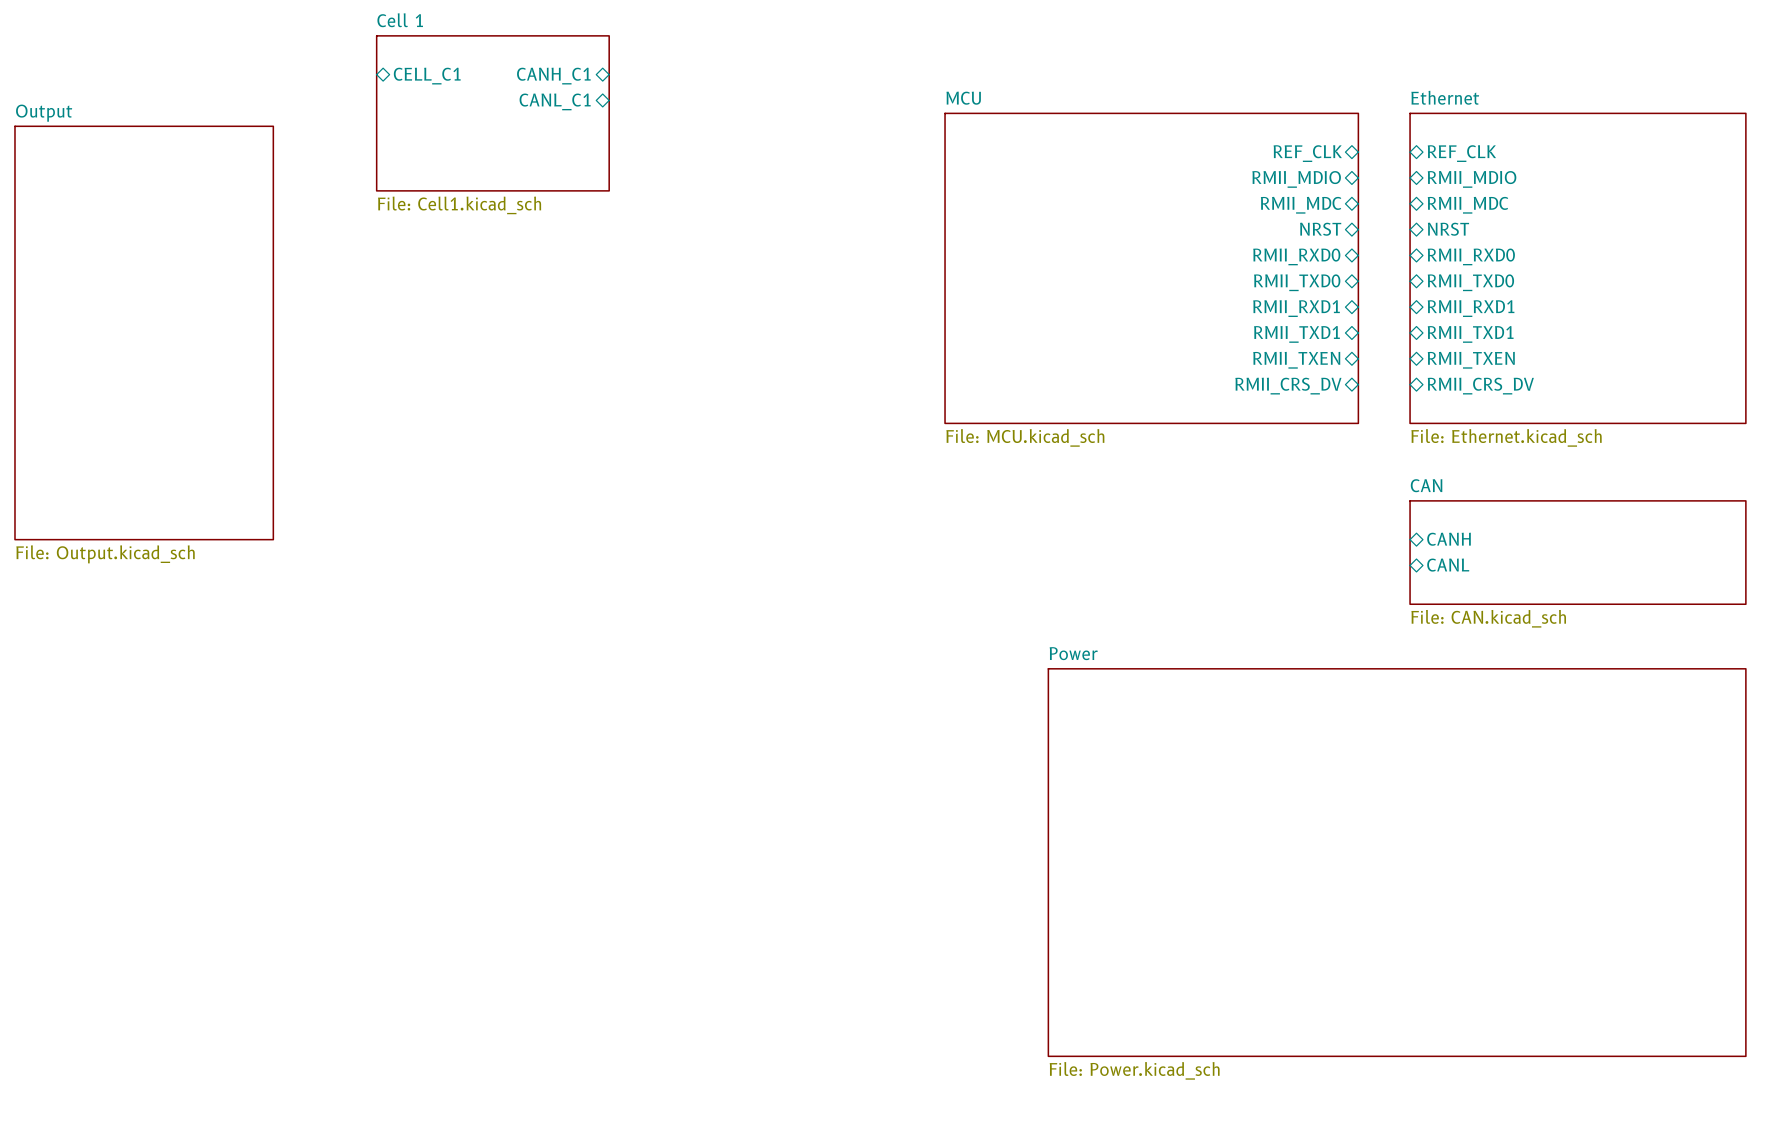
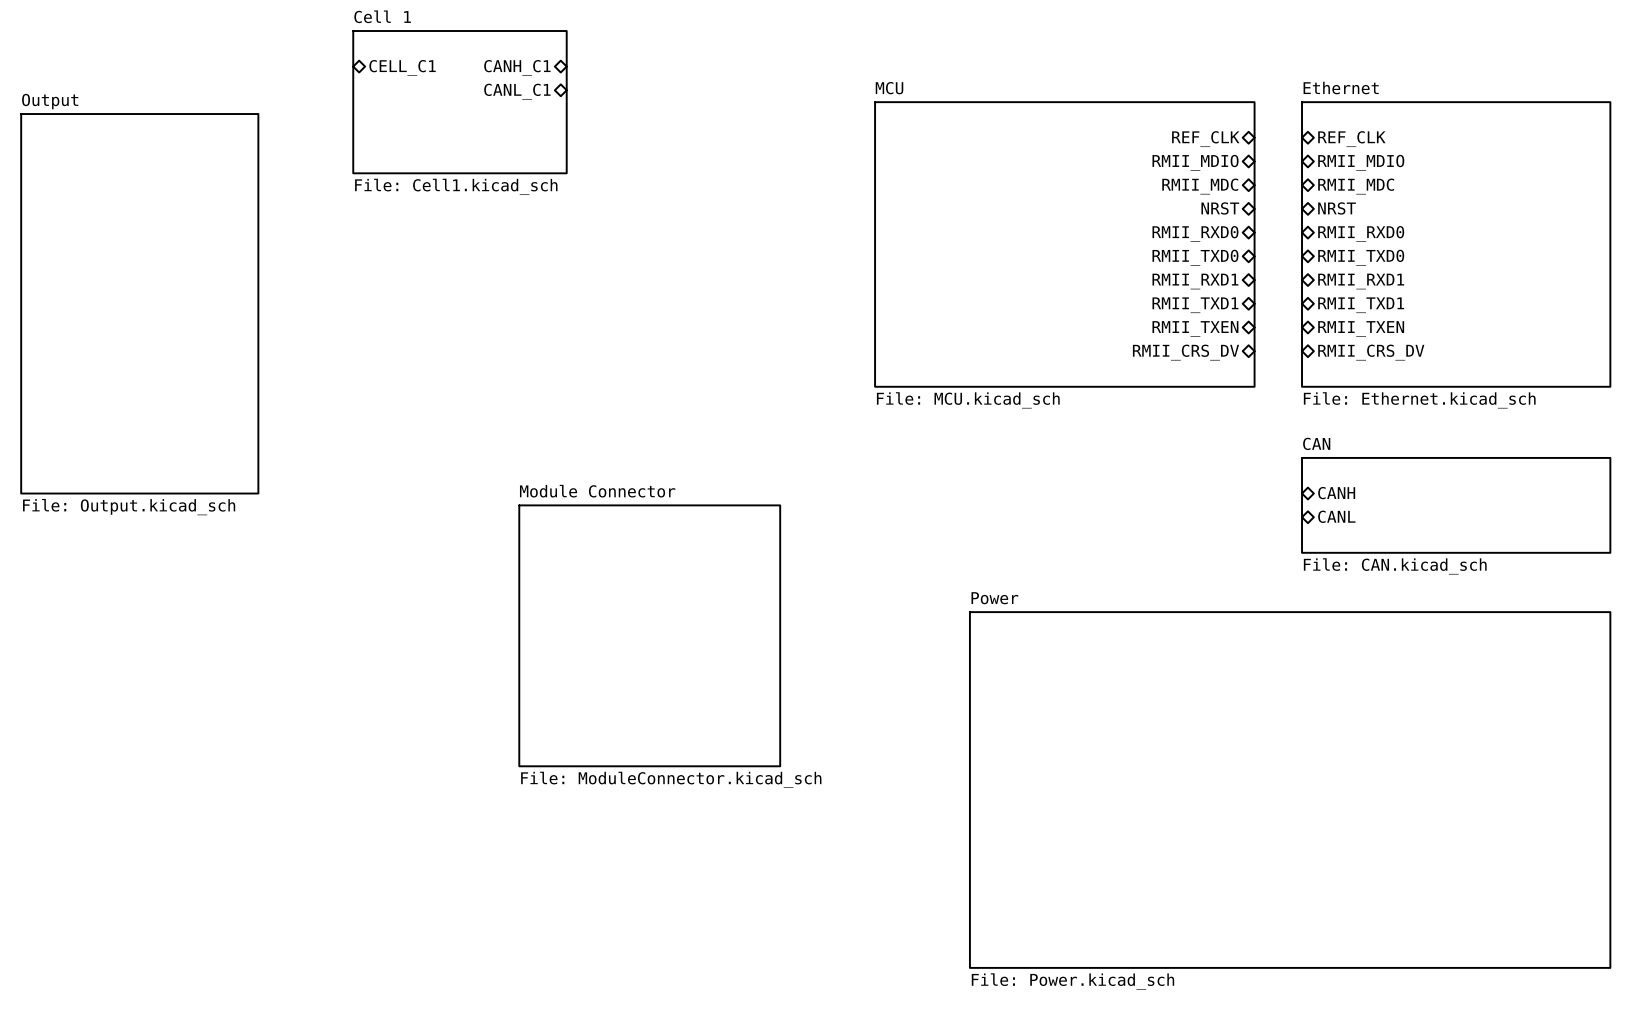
sheet Module Connector: none -> File: ModuleConnector.kicad_sch (649, 635)

